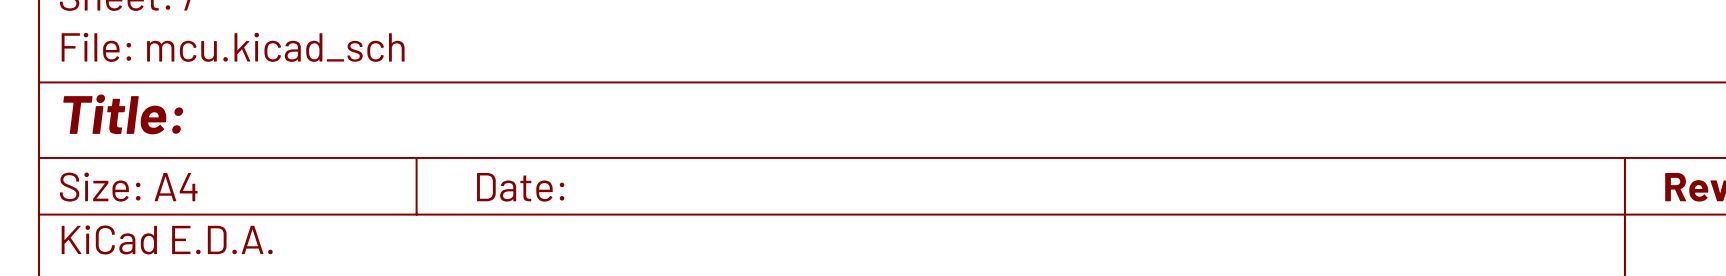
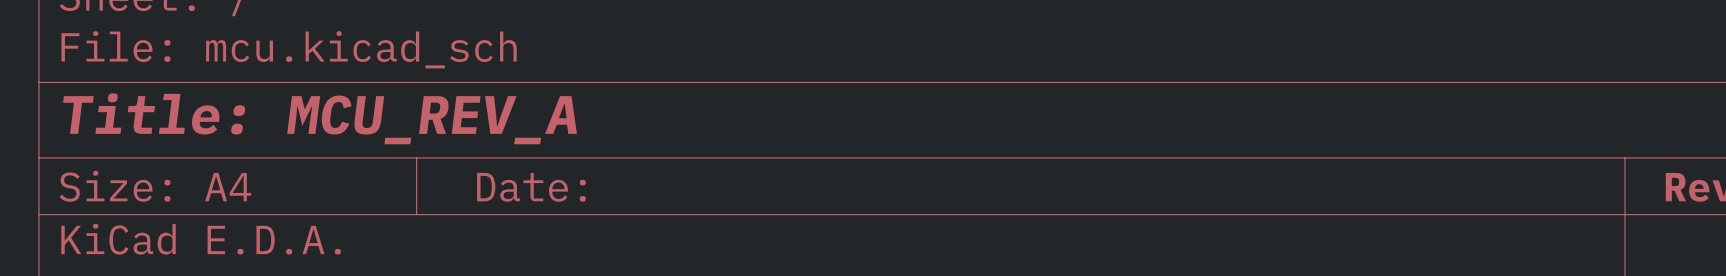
title block: Title: (123, 114) -> Title: MCU_REV_A (320, 118)

